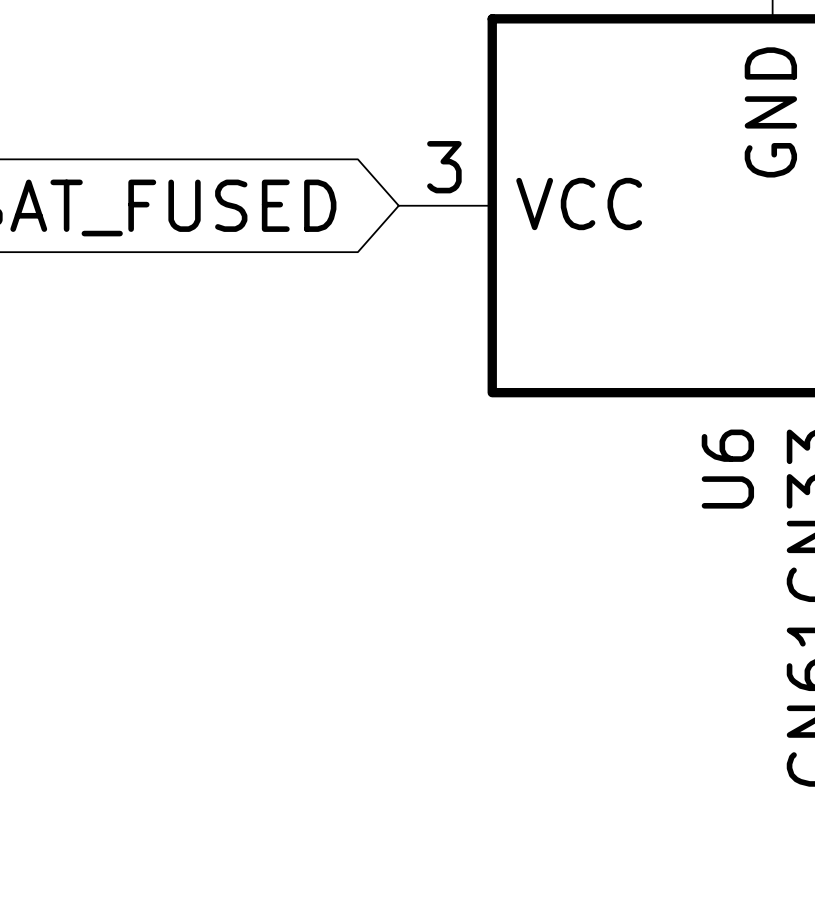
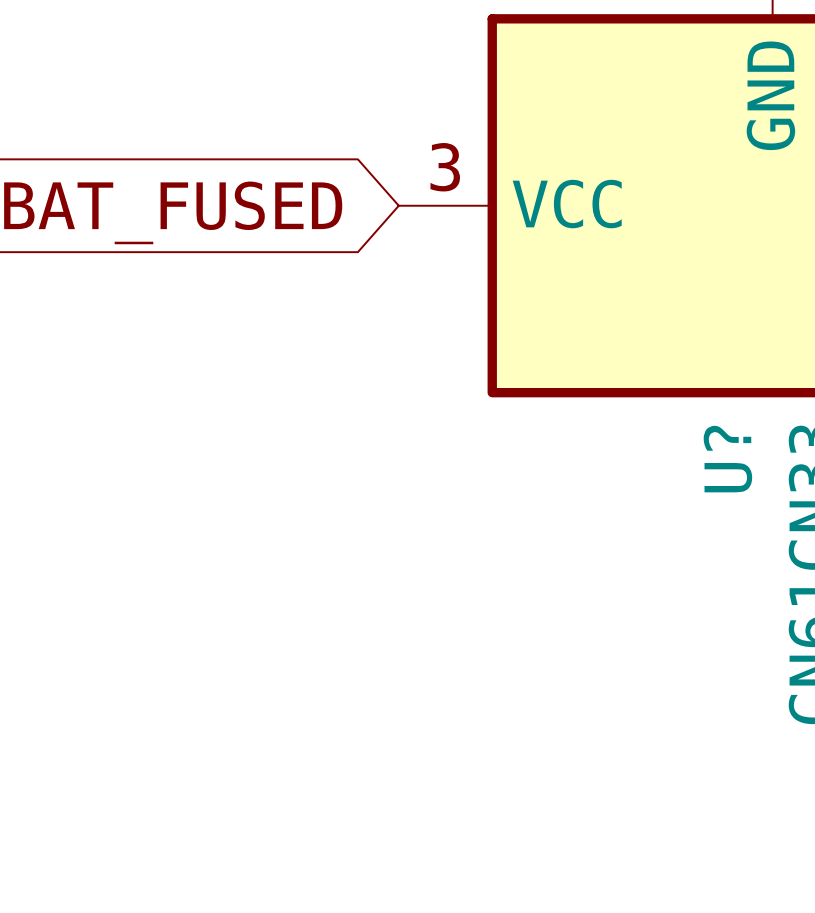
U6 name: U6 (727, 469) -> U? (727, 459)

